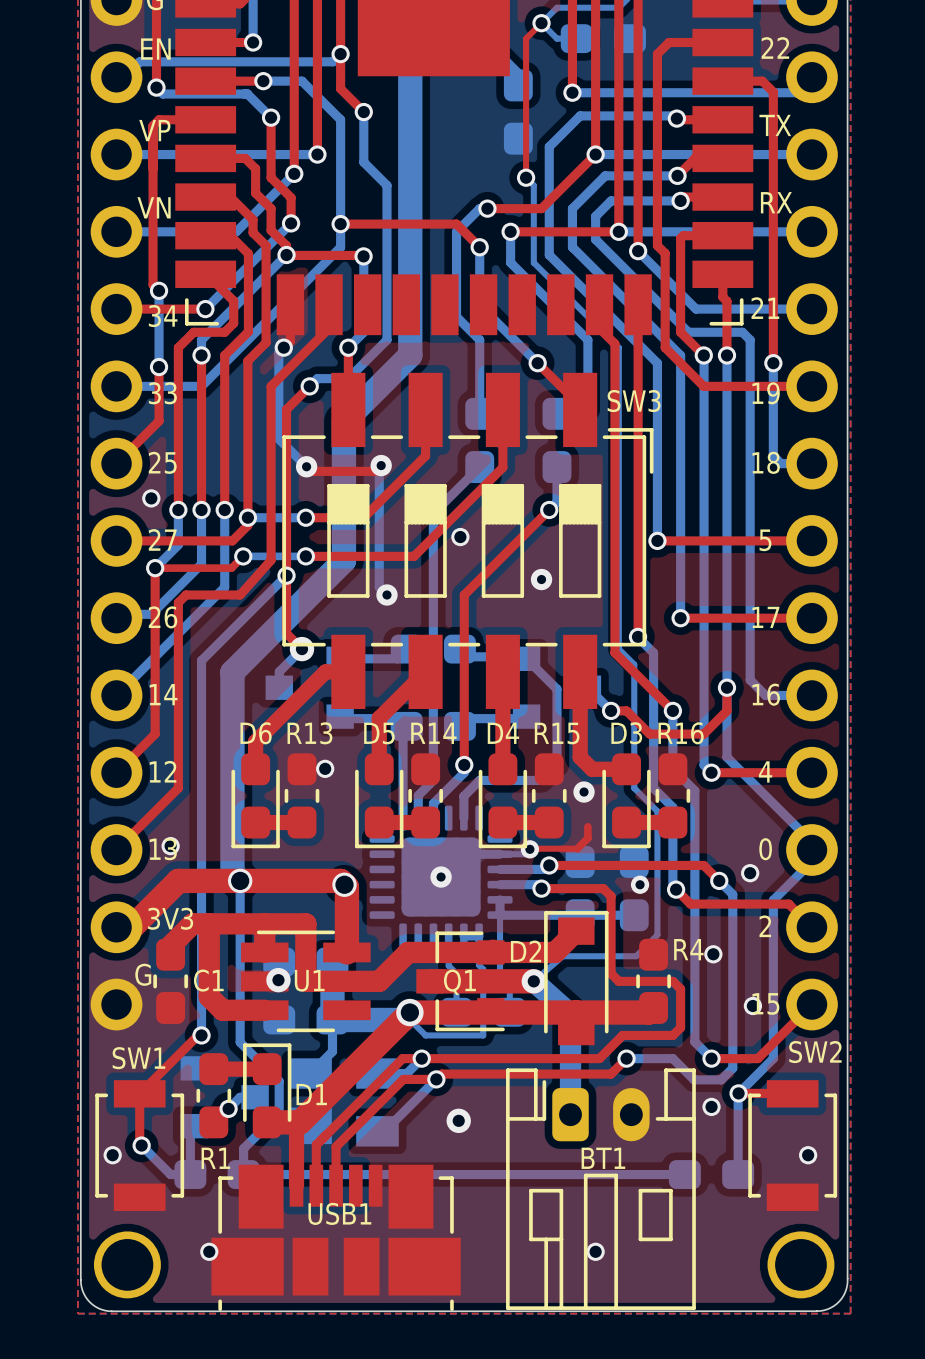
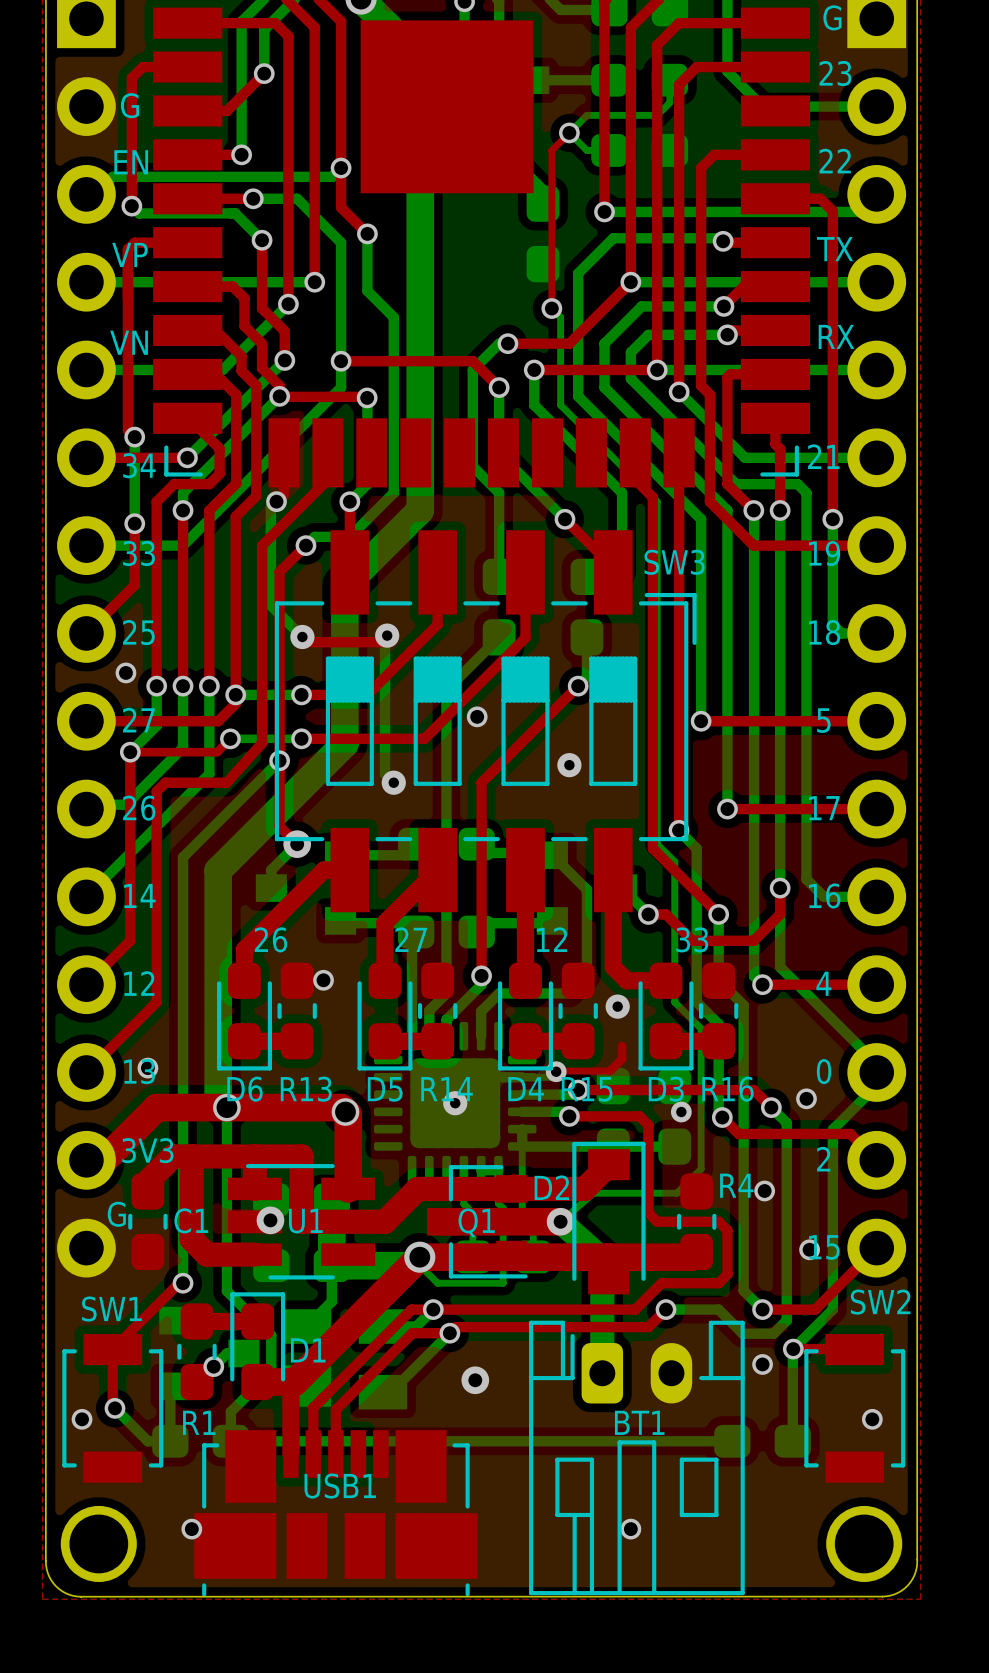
D6 name position: D6 (256, 733) -> D6 (245, 1089)
text: none -> 26 (270, 939)
R13 name position: R13 (309, 733) -> R13 (306, 1089)
D5 name position: D5 (379, 733) -> D5 (385, 1089)
text: none -> 27 (411, 939)
R14 name position: R14 (433, 733) -> R14 (447, 1089)
D4 name position: D4 (503, 733) -> D4 (526, 1089)
text: none -> 12 (551, 939)
R15 name position: R15 (557, 733) -> R15 (587, 1089)
D3 name position: D3 (626, 733) -> D3 (666, 1089)
text: none -> 33 (692, 939)
R16 name position: R16 (681, 733) -> R16 (727, 1089)

